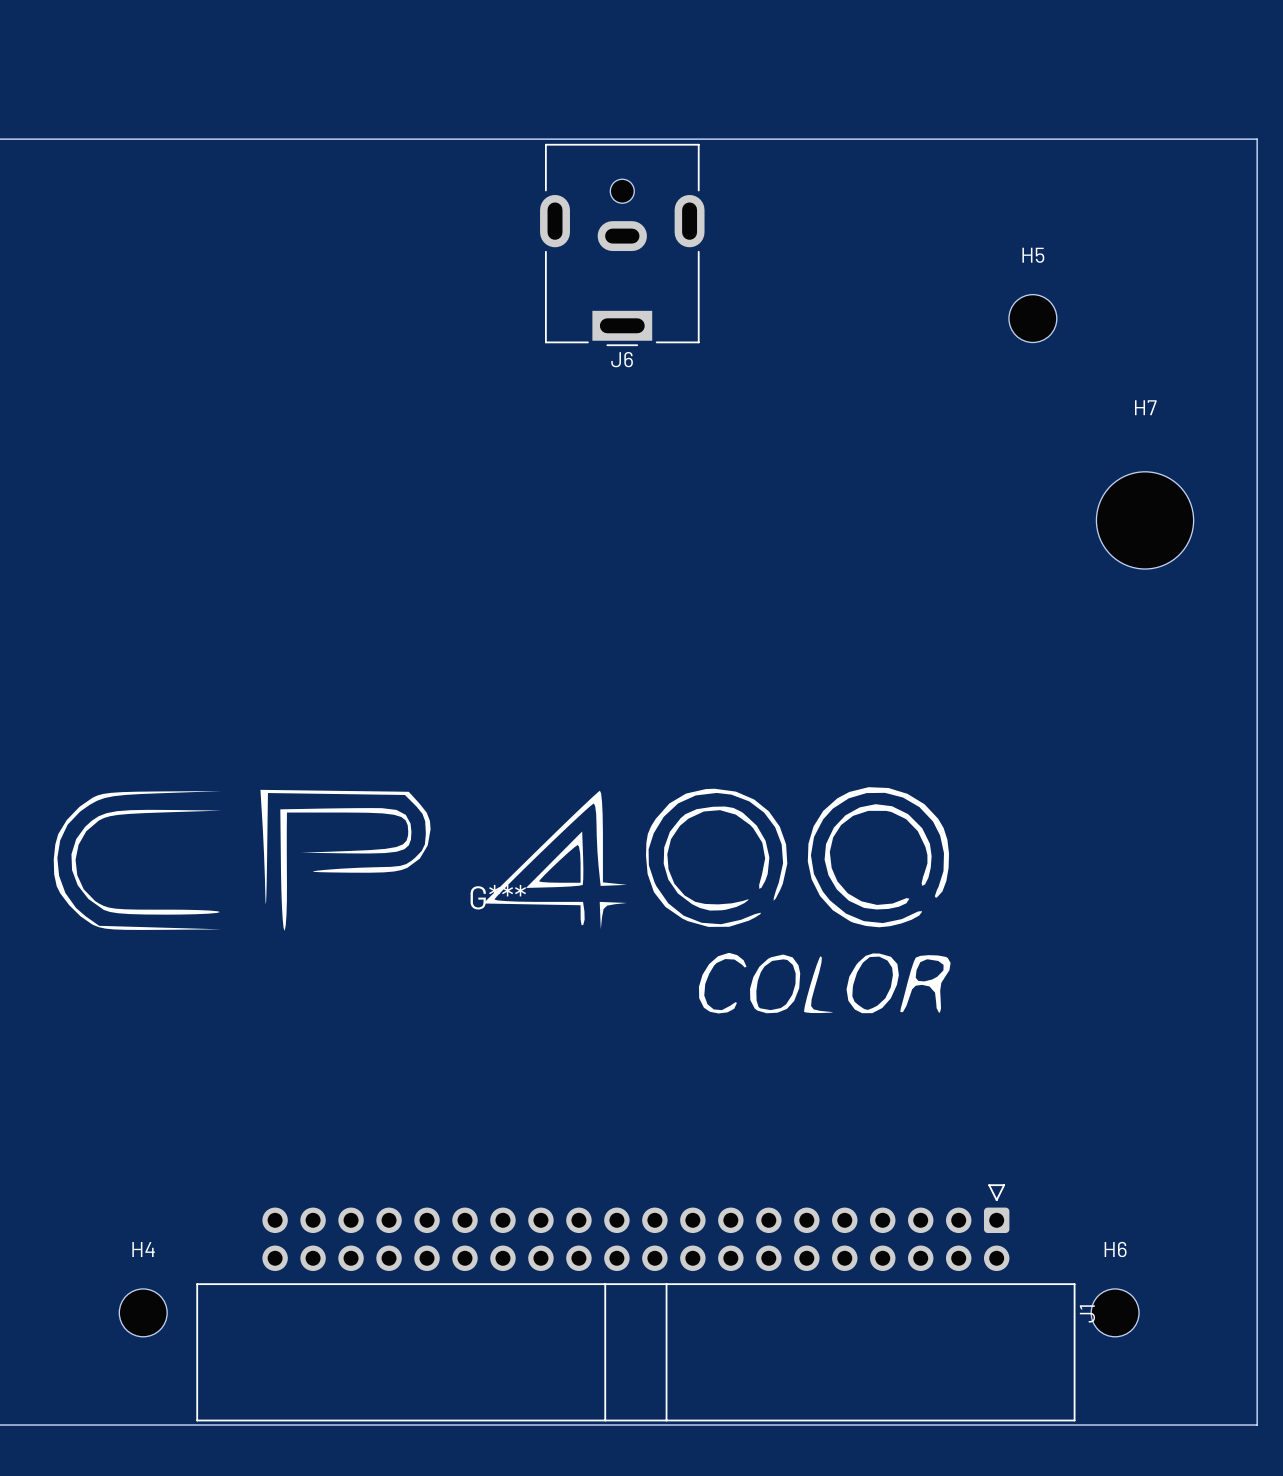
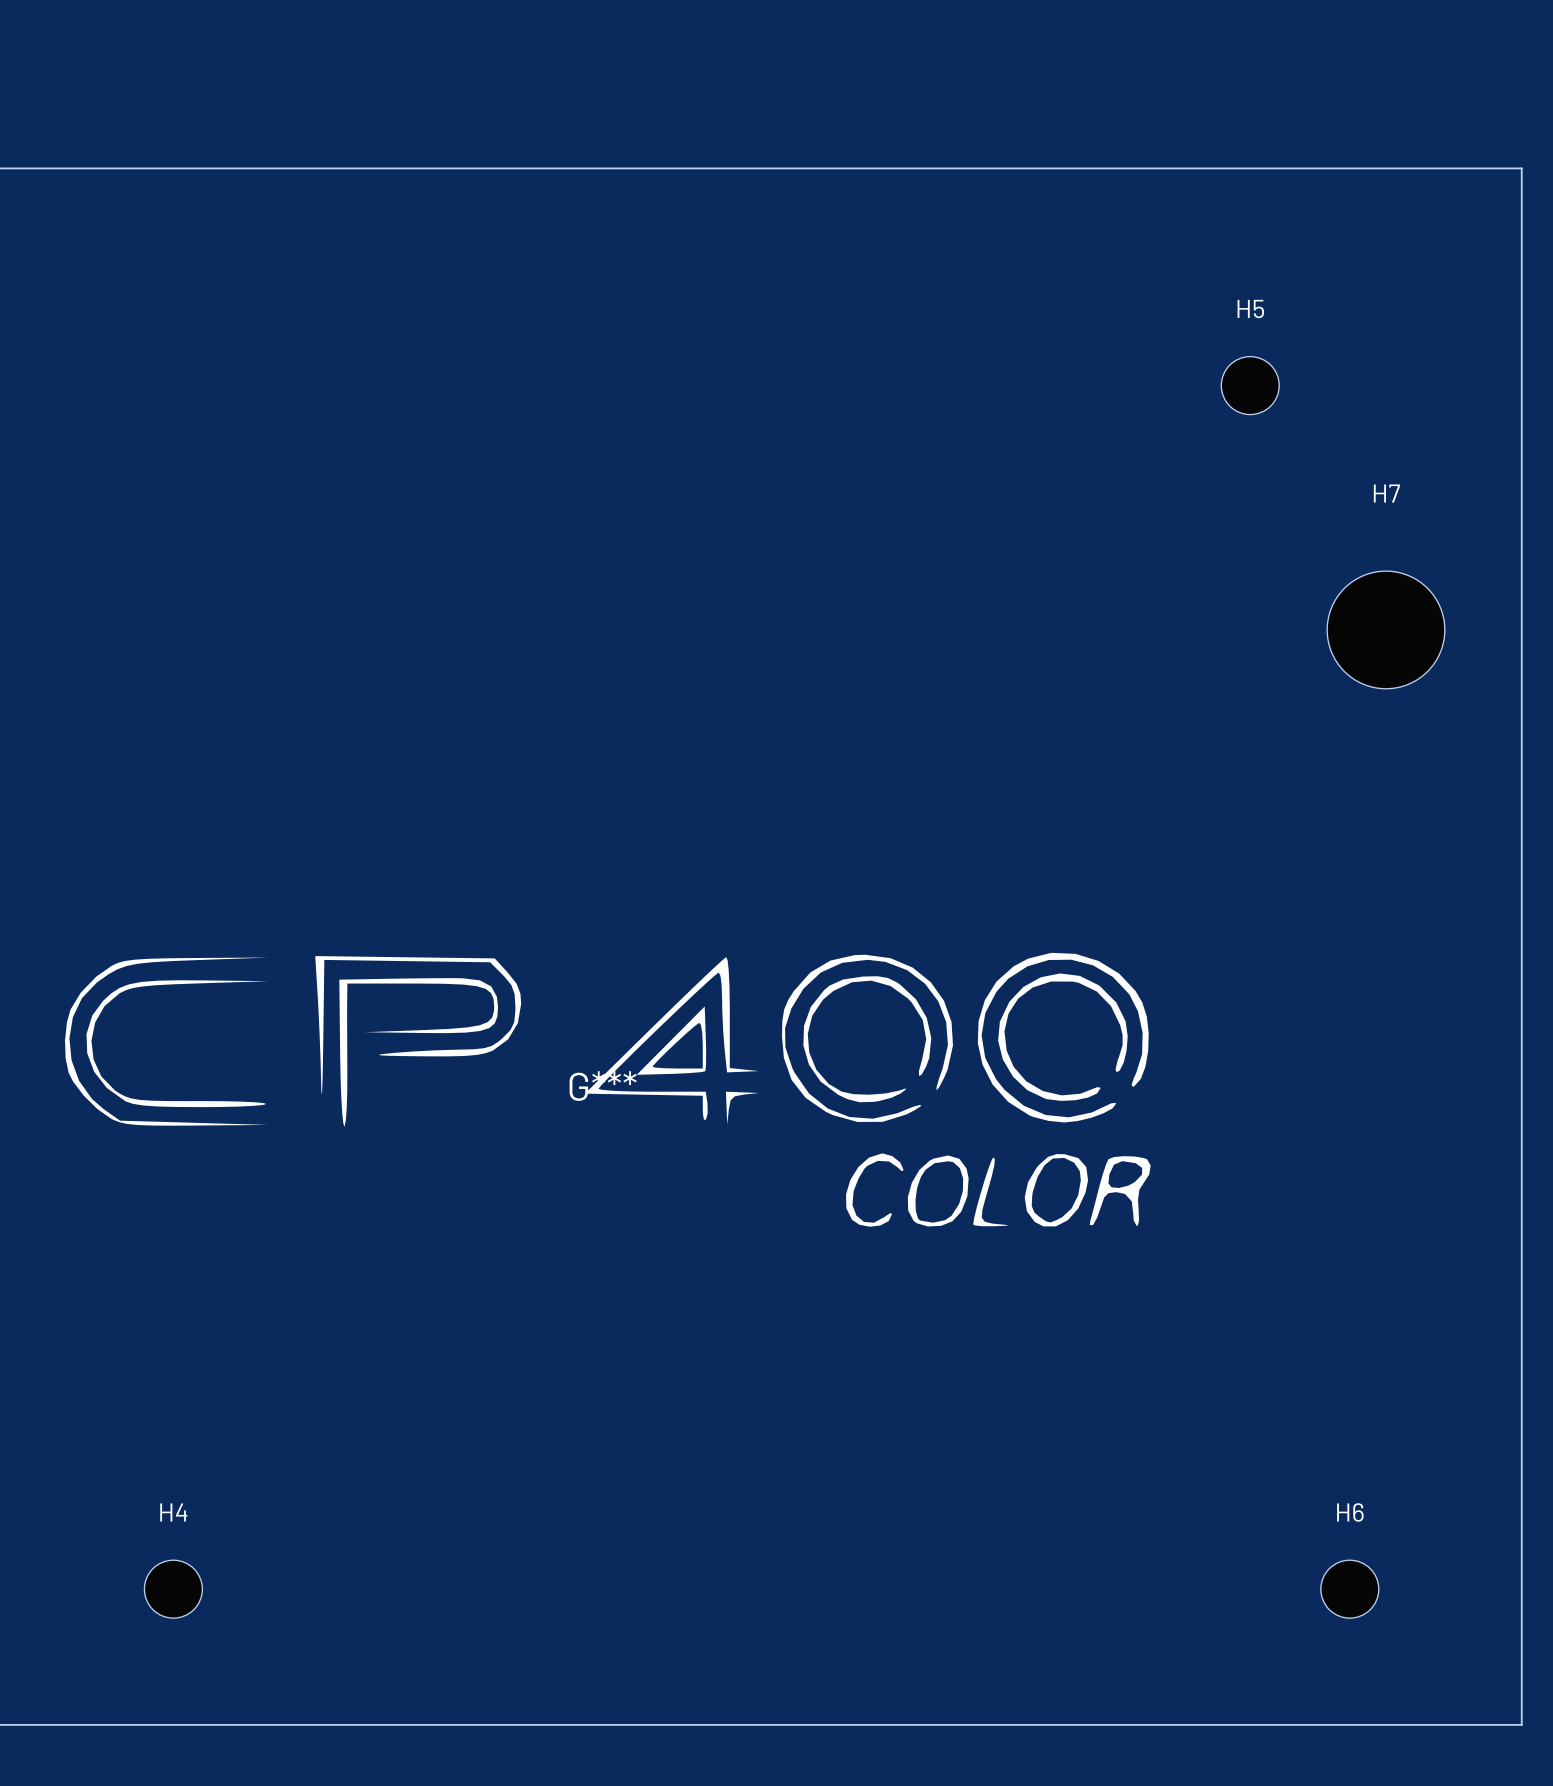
J6: (622, 244) -> none
J1: (635, 1302) -> none

